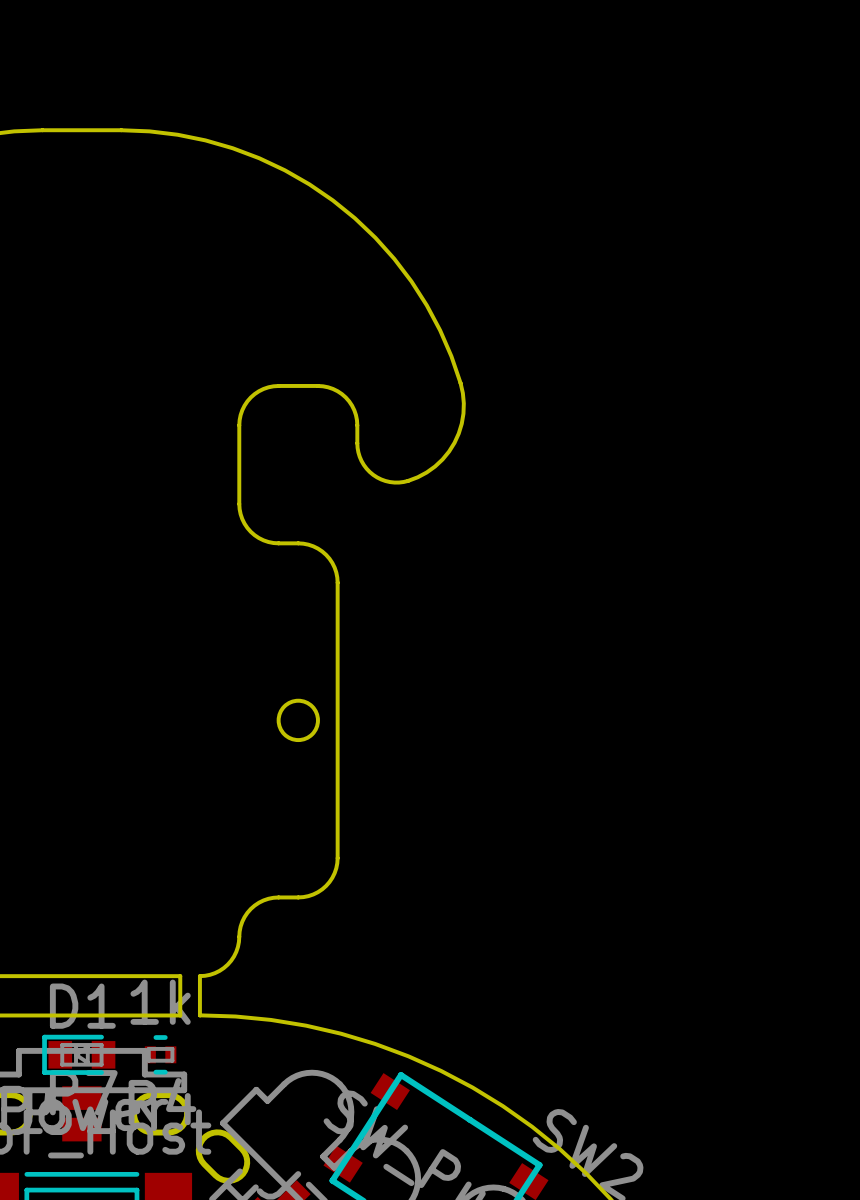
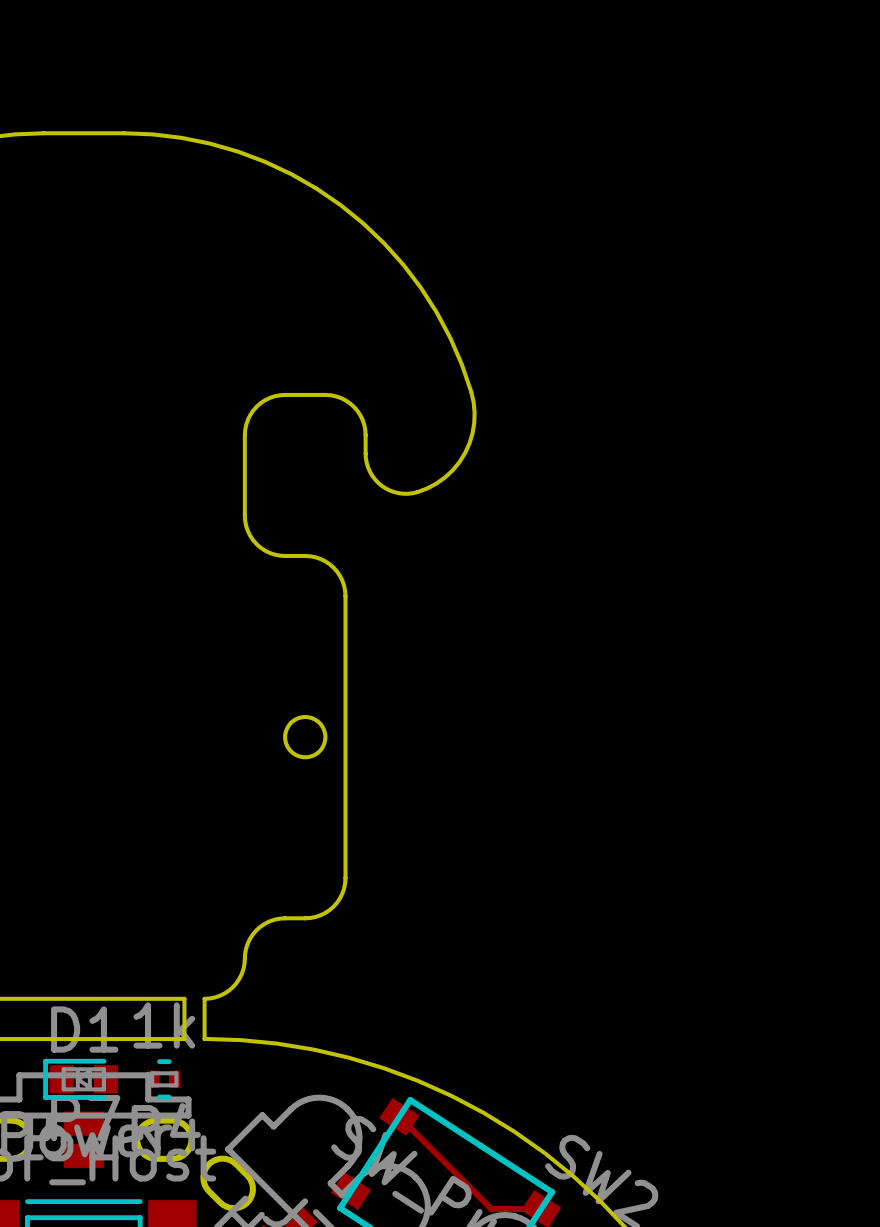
top track: none -> (399, 1116) (491, 1209) (541, 1209)

